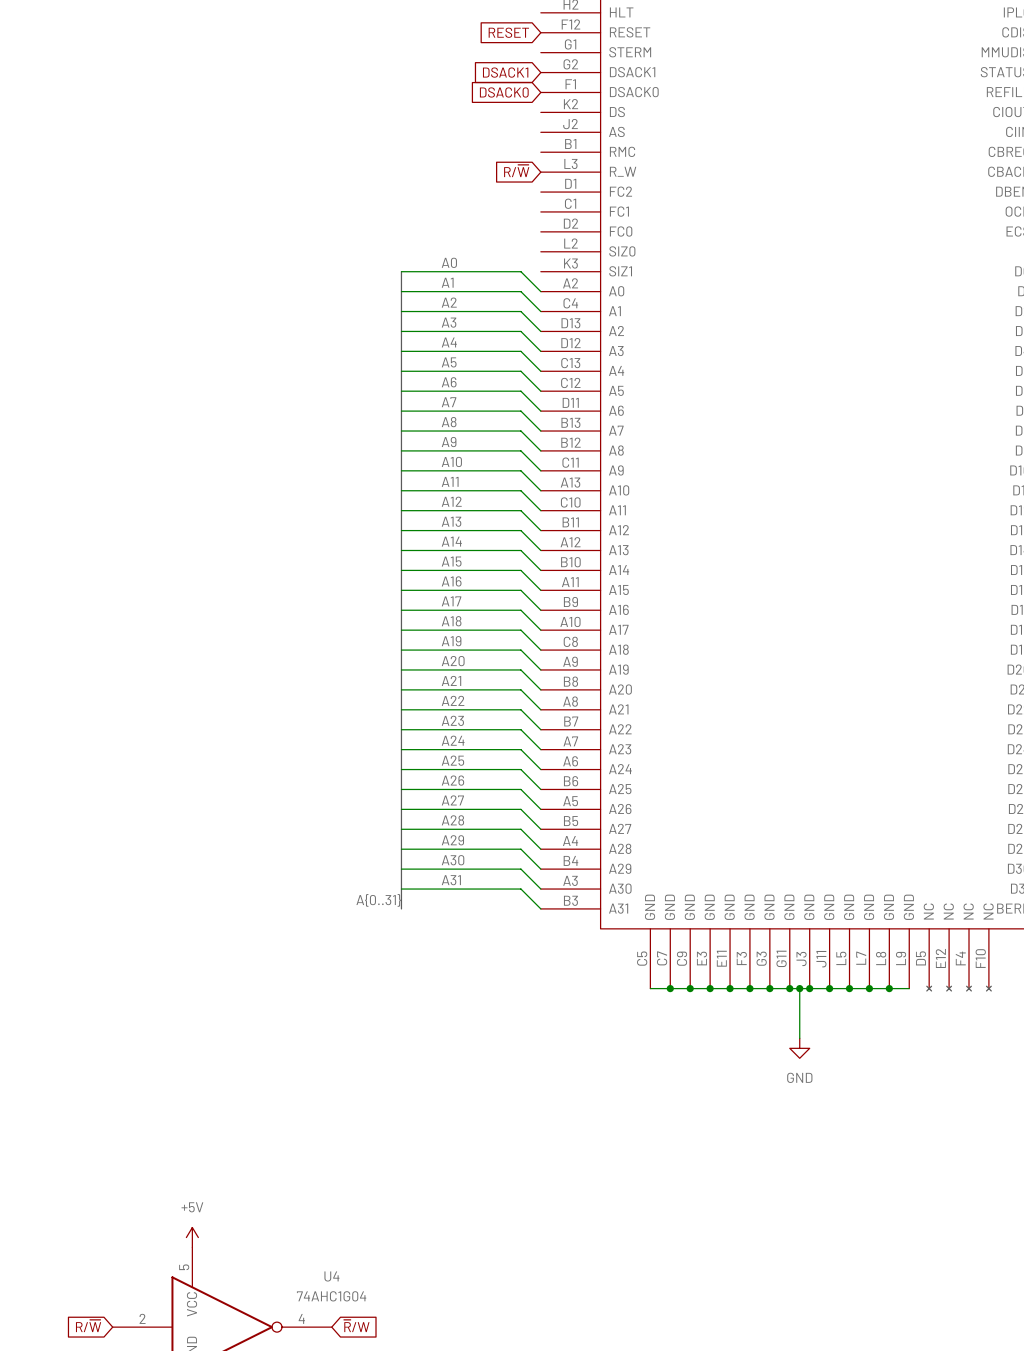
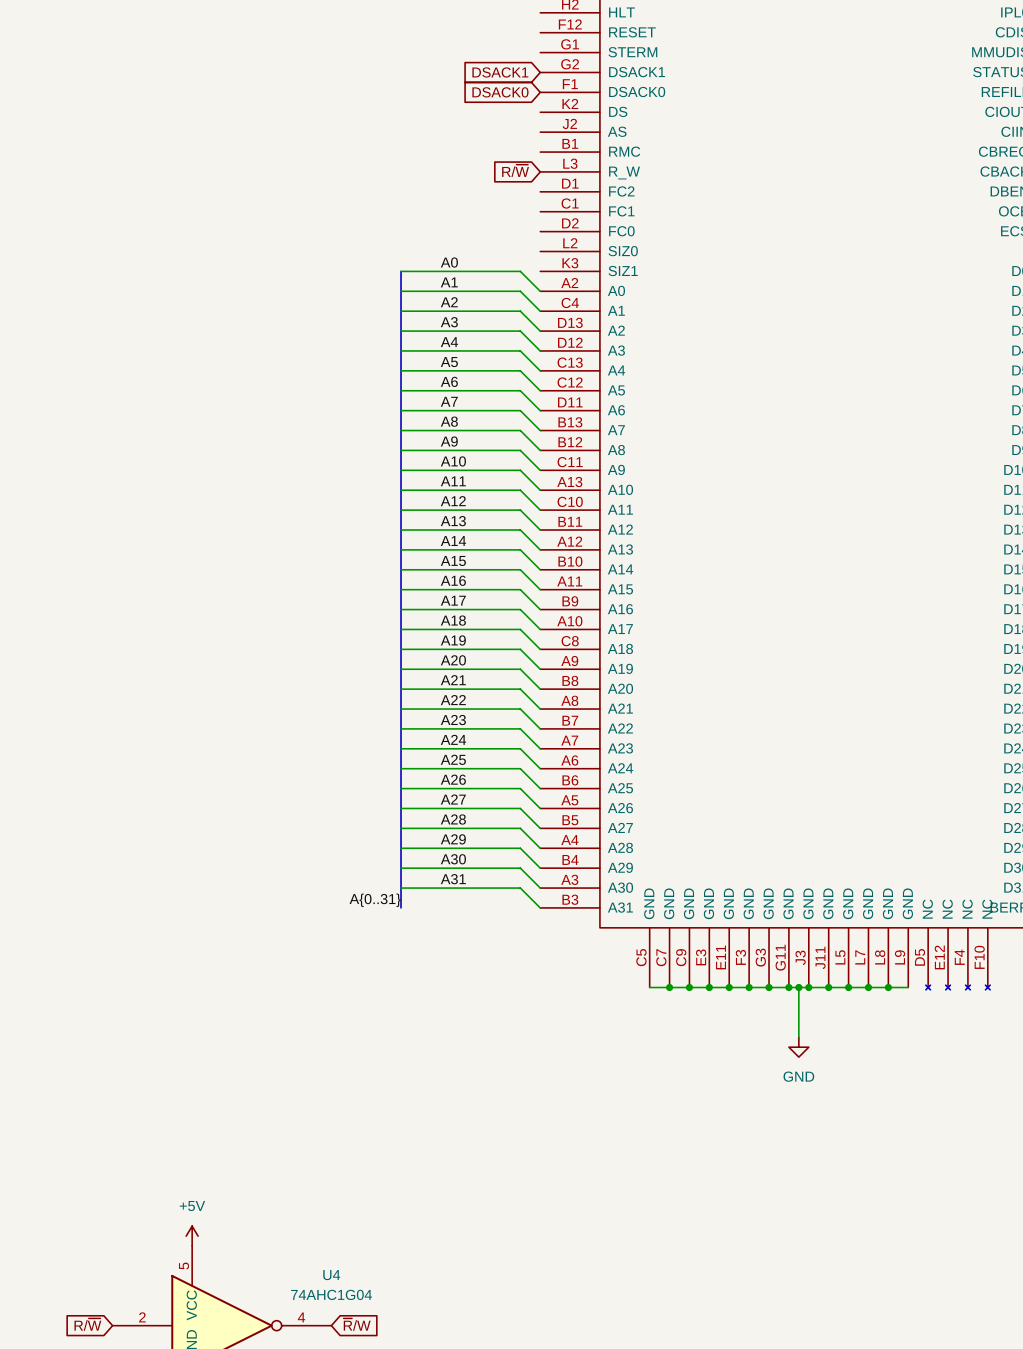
global label: RESET (508, 32) -> none

